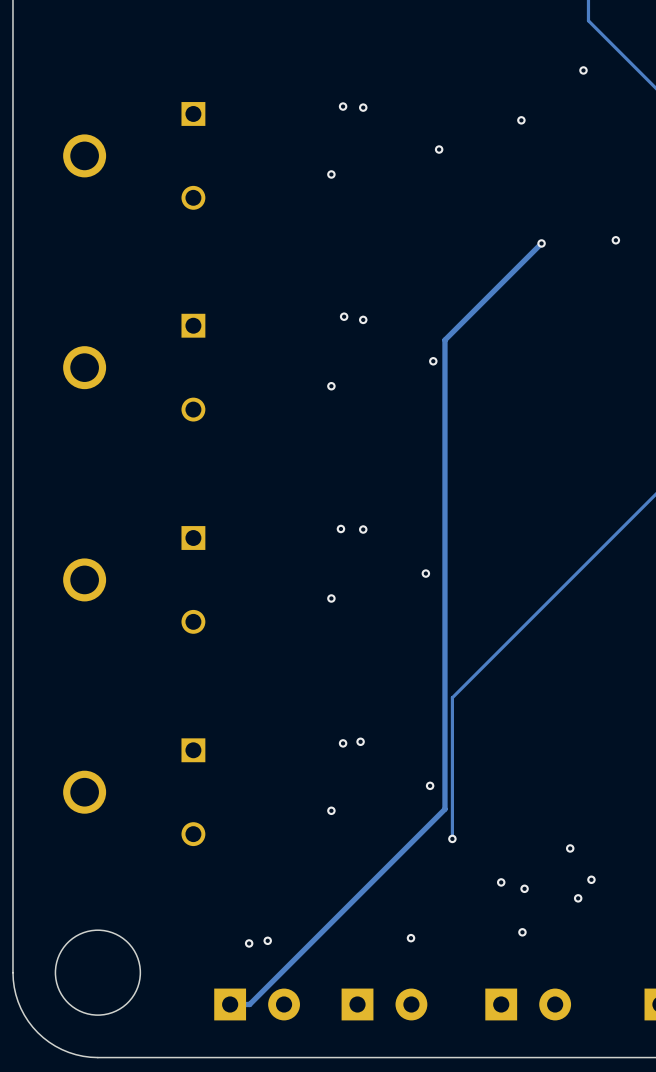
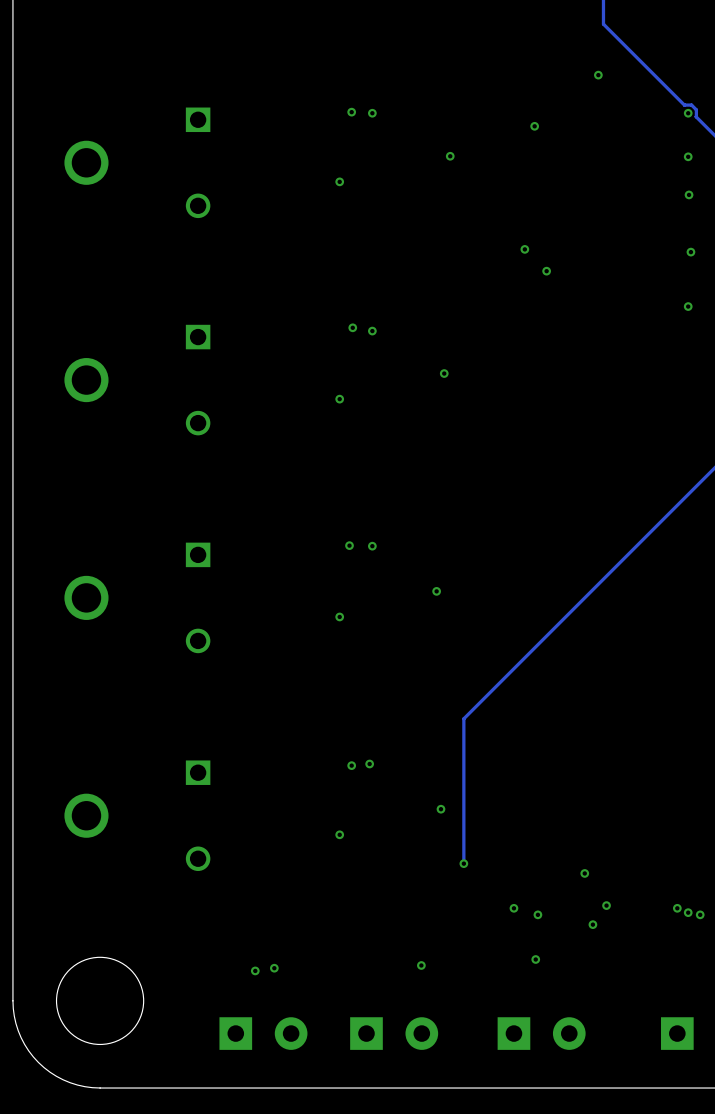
via: none -> (524, 249)
via: (615, 240) -> none
track: (541, 243) (444, 340) (444, 809) (249, 1004) (230, 1004) -> none
via: (541, 243) -> none
via: none -> (546, 271)

